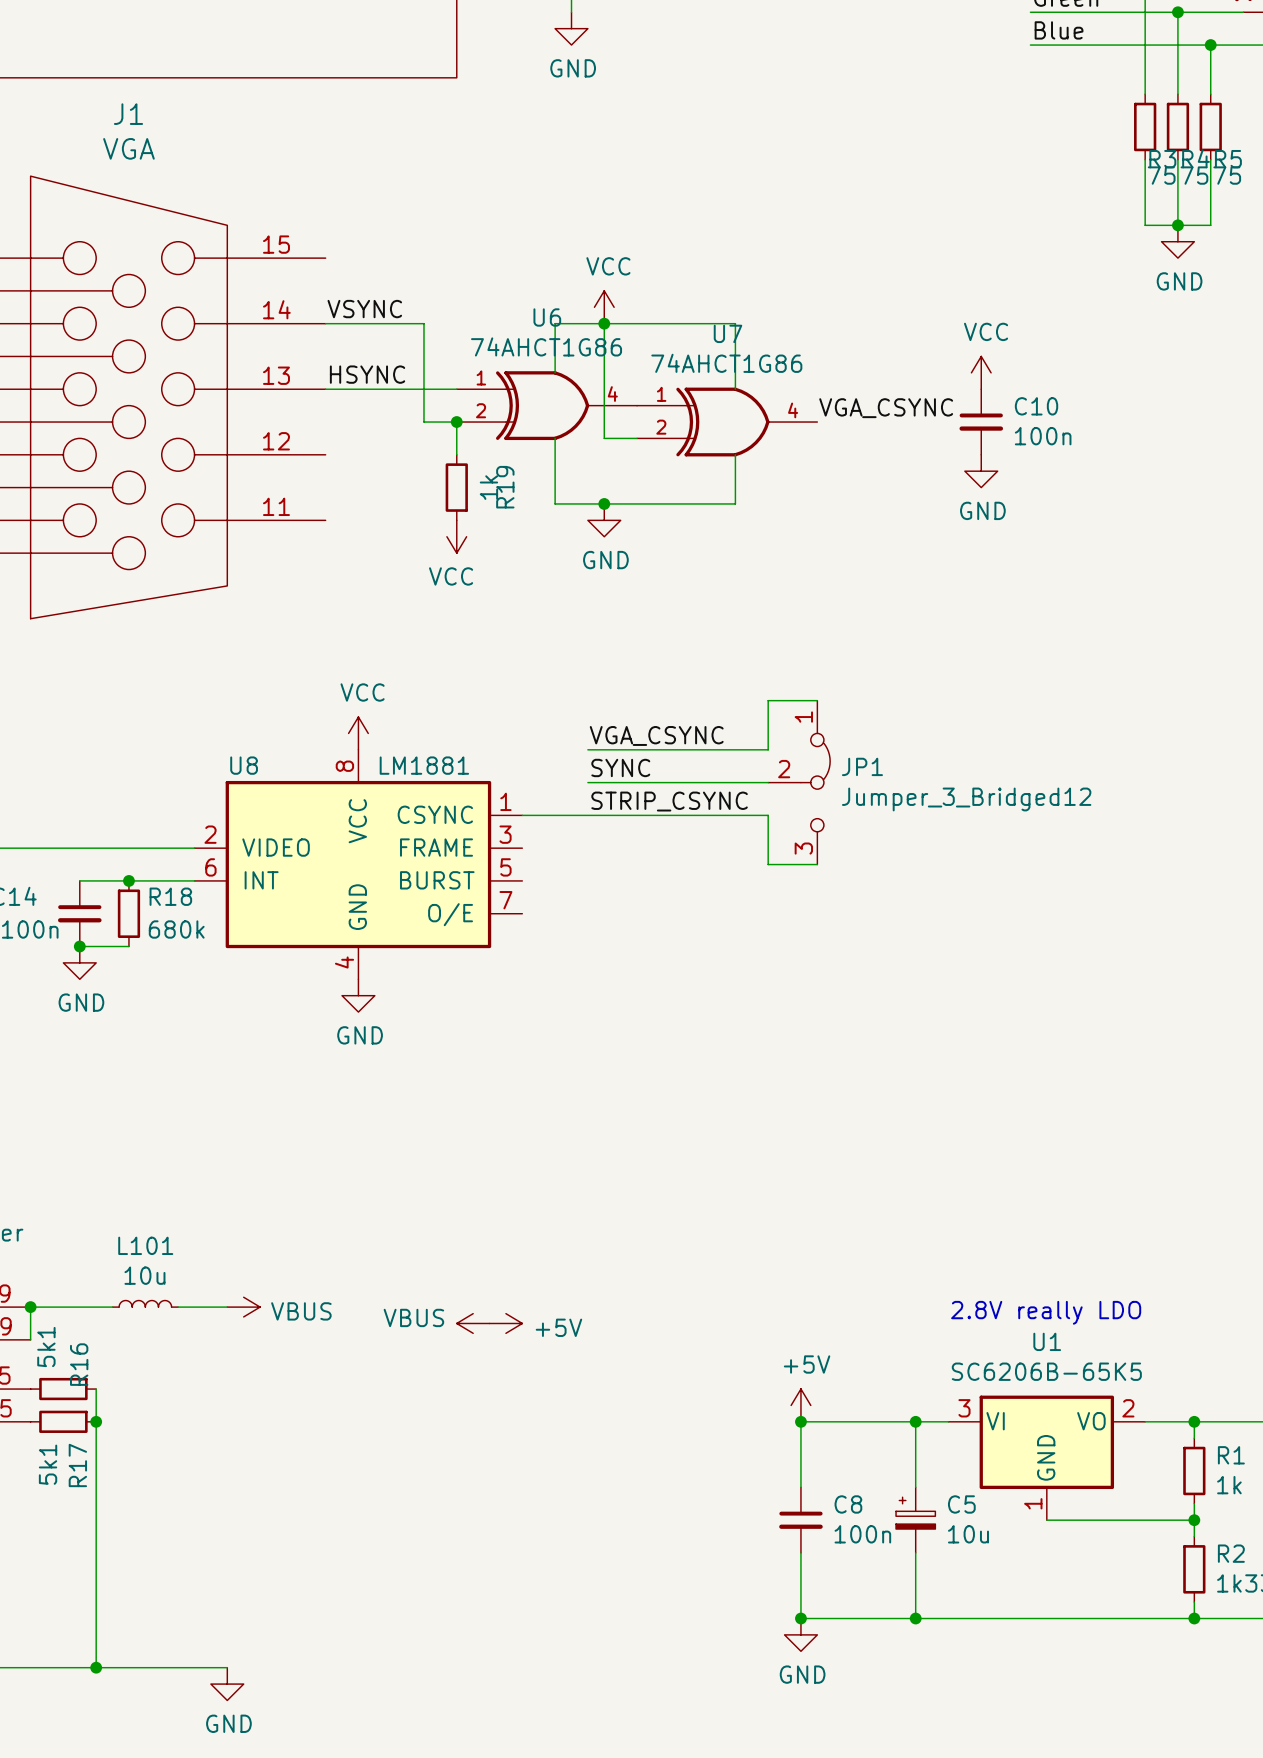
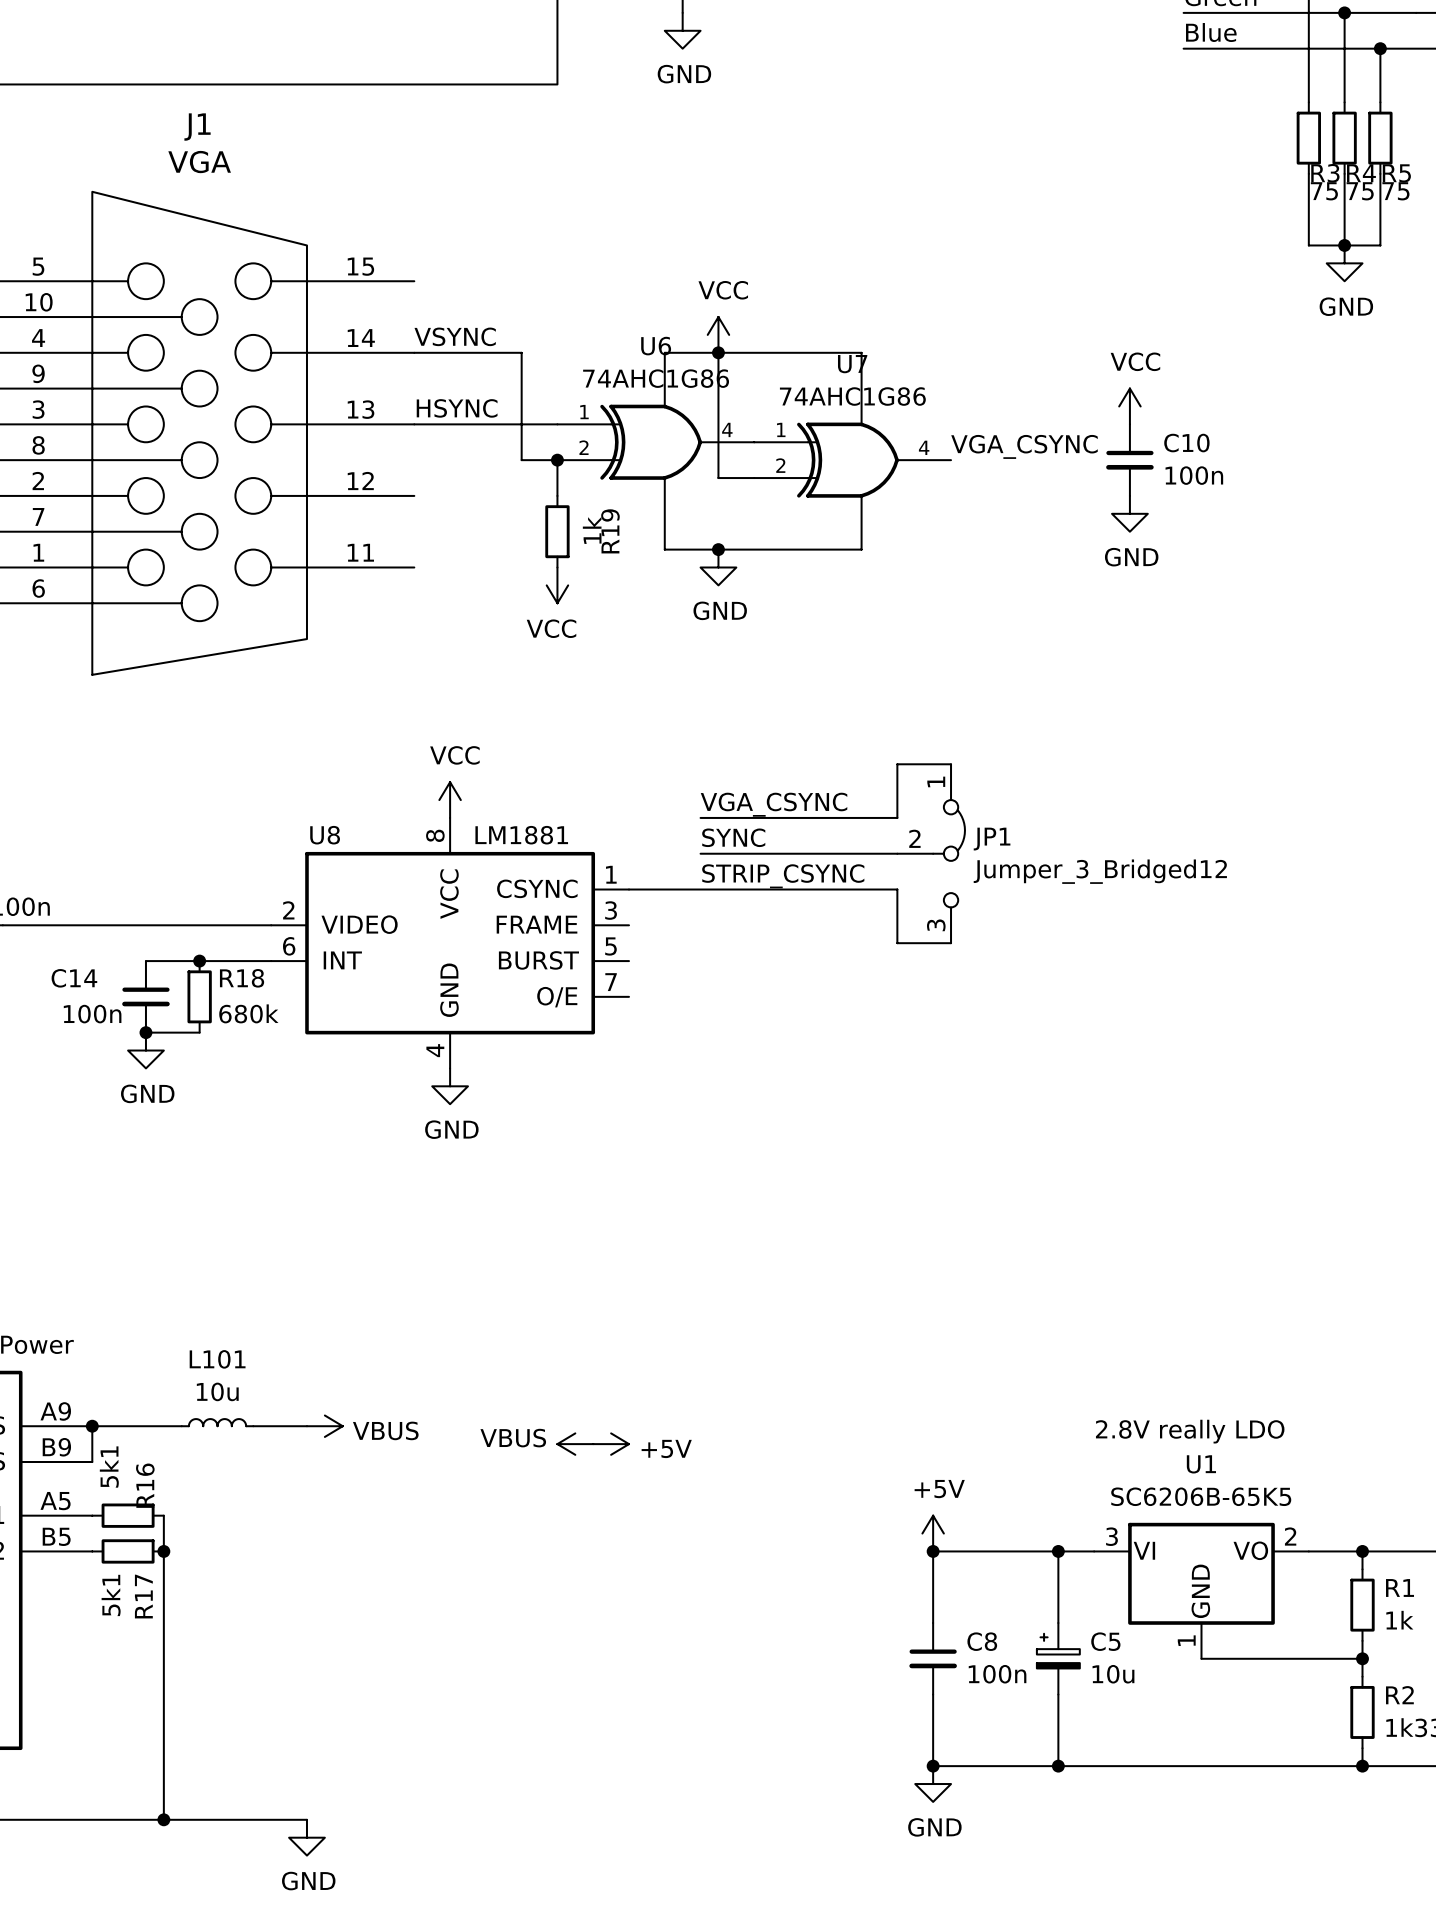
U6 value: 74AHCT1G86 (546, 346) -> 74AHC1G86 (656, 378)
U7 value: 74AHCT1G86 (726, 363) -> 74AHC1G86 (852, 396)

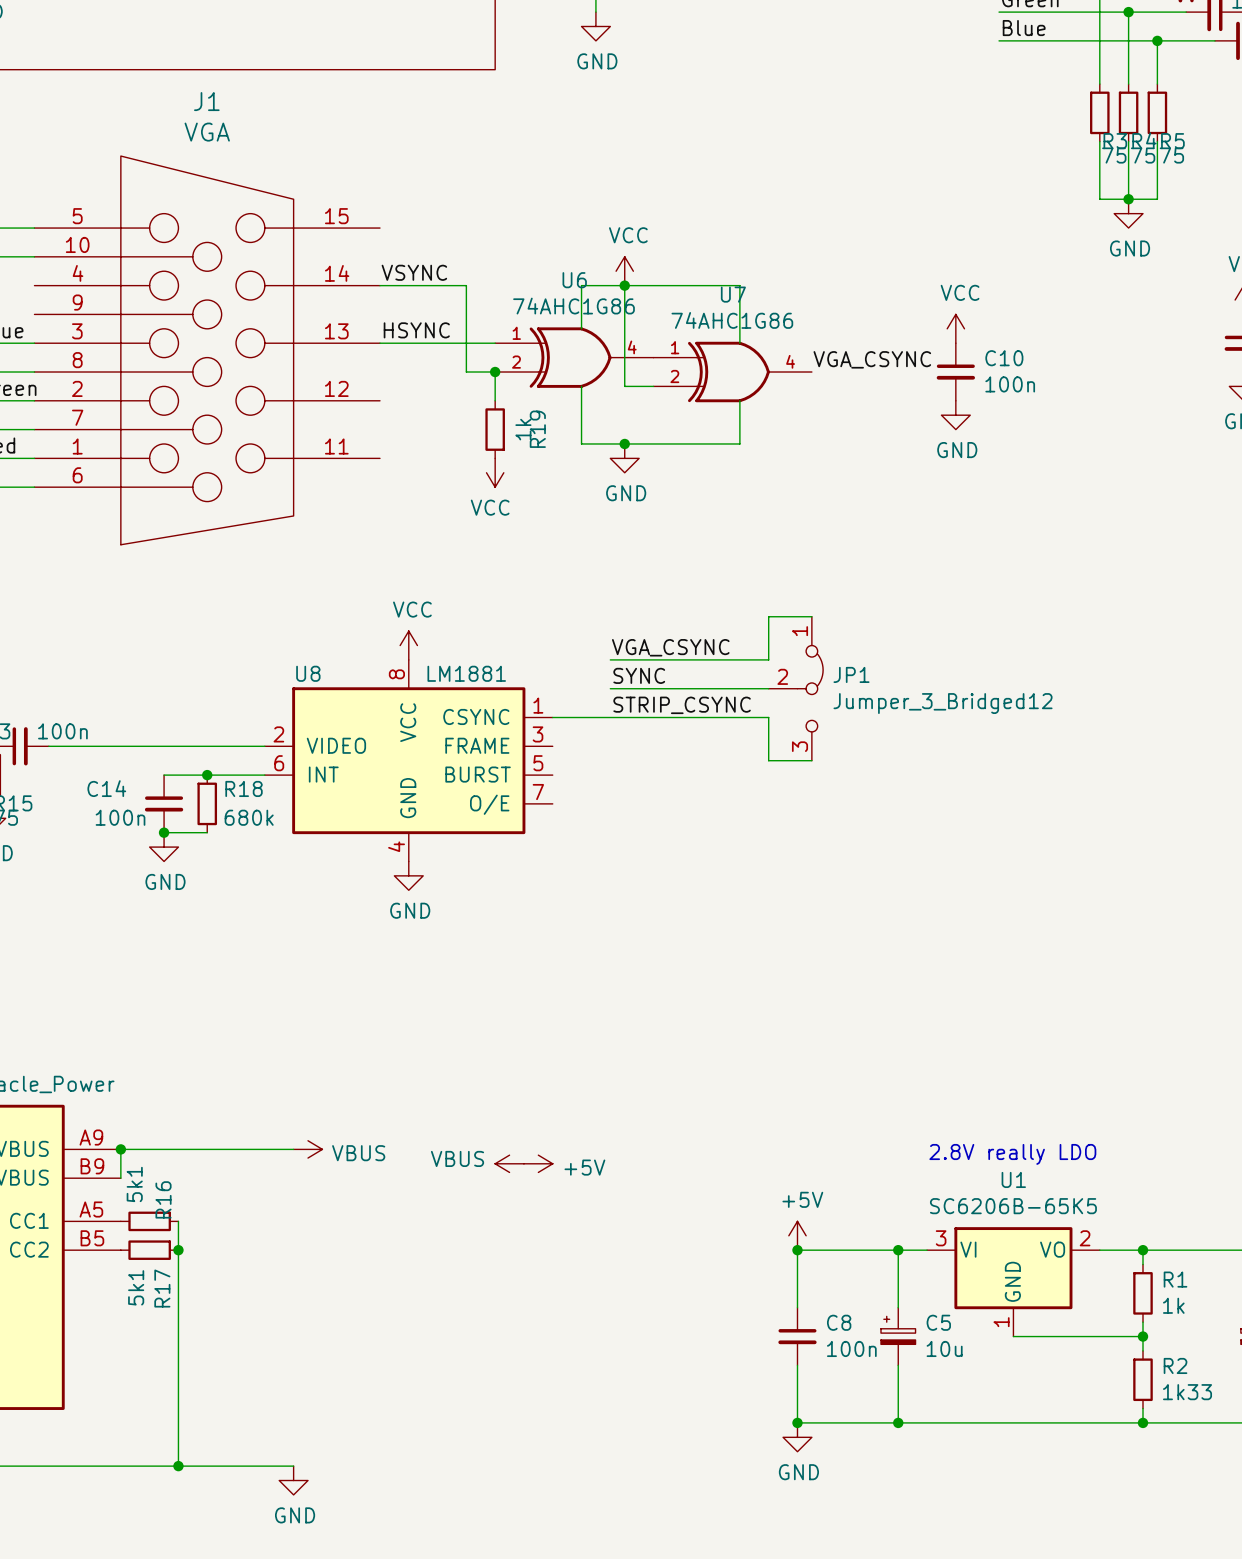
L101: 10u (217, 1422) -> none
wire: none -> (192, 1149) (250, 1149)

